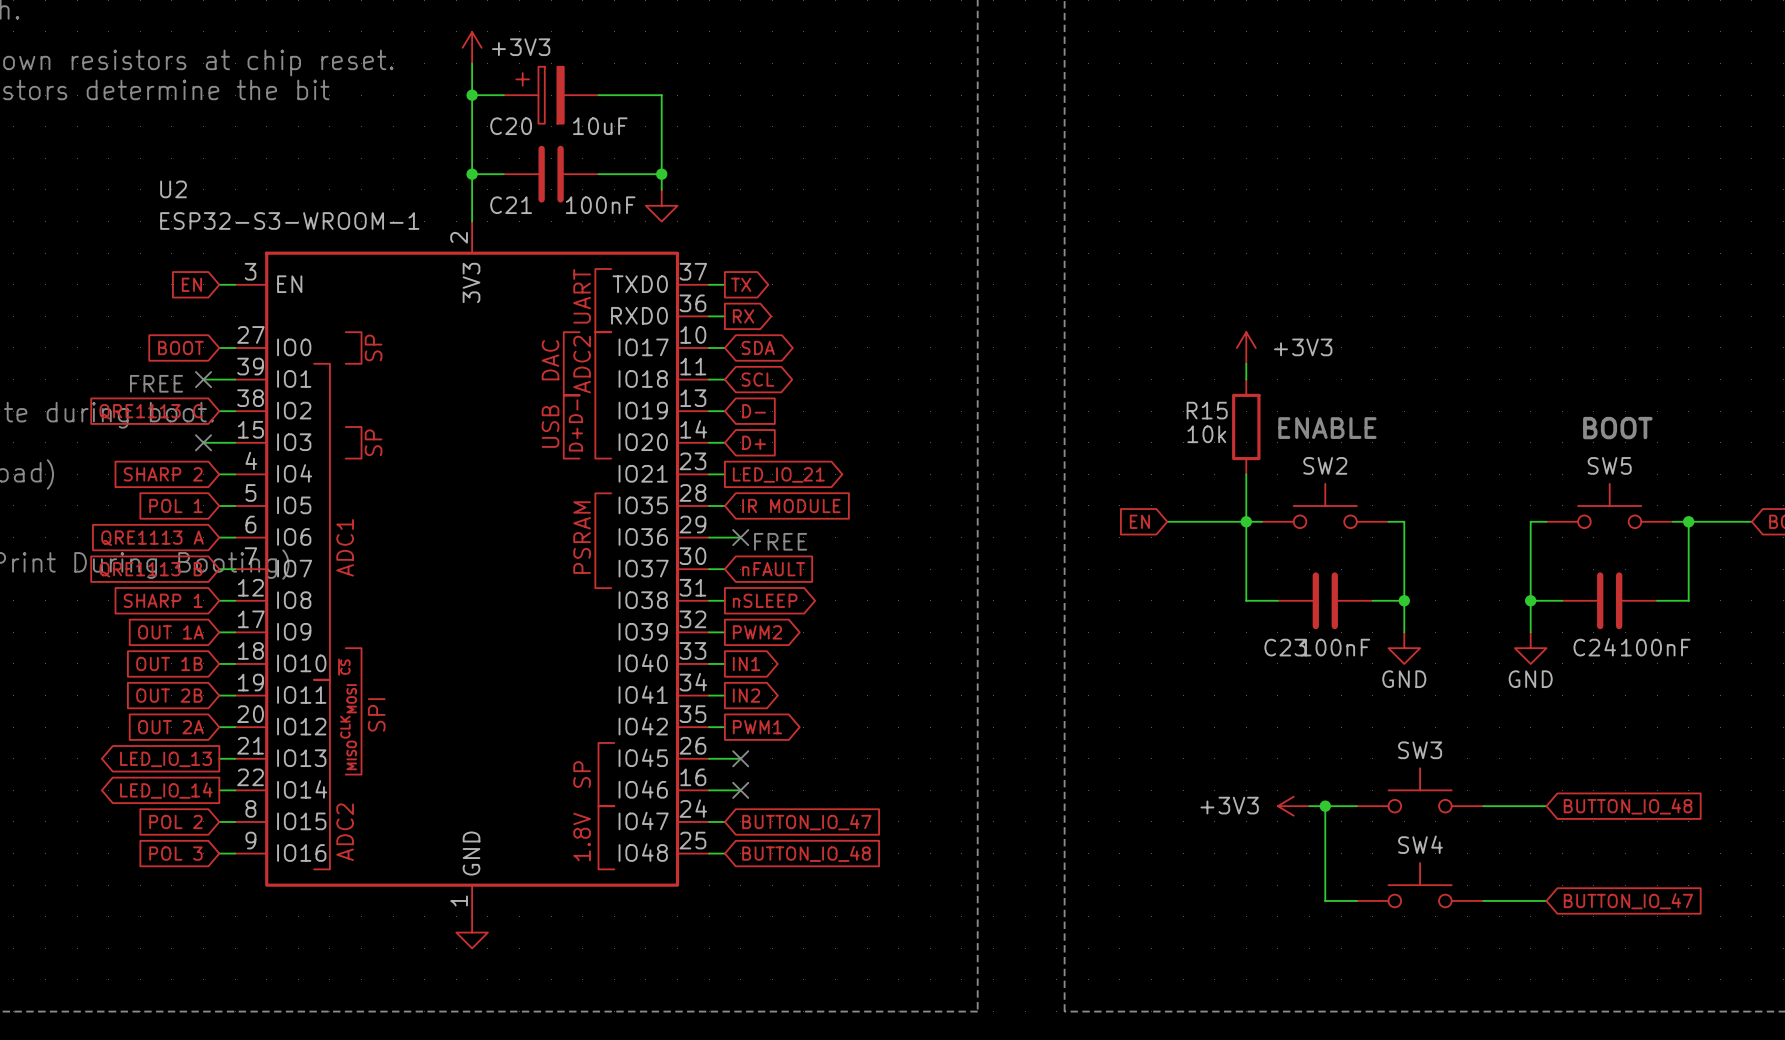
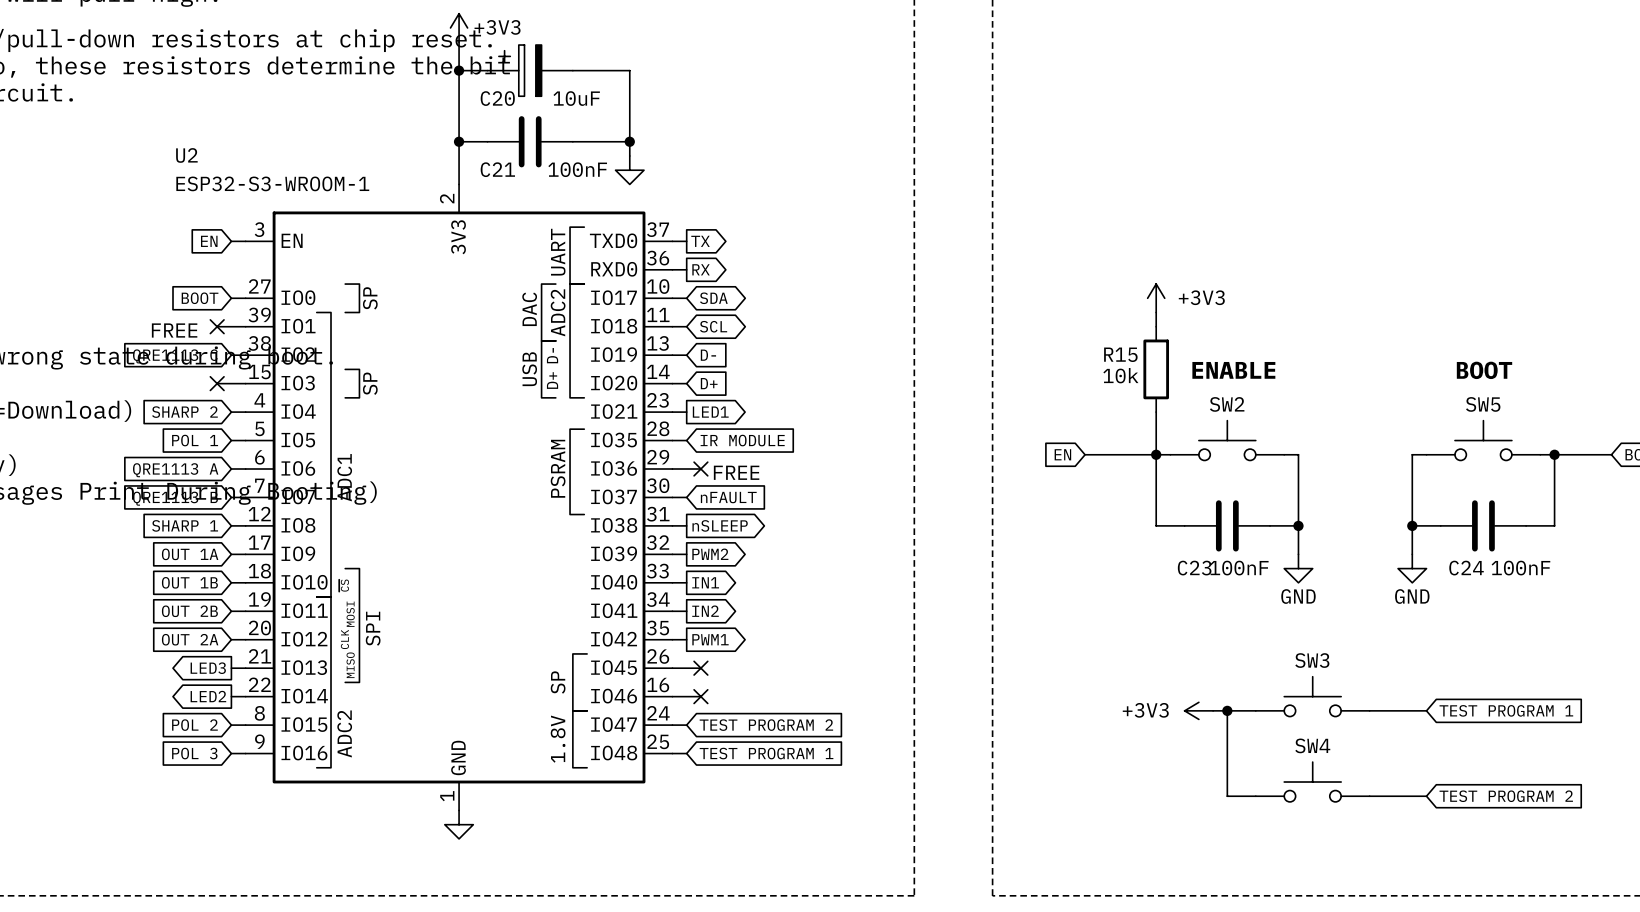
global label: LED_IO_21 (778, 474) -> LED1 (710, 412)
global label: LED_IO_13 (166, 759) -> LED3 (208, 668)
global label: LED_IO_14 (166, 790) -> LED2 (208, 696)
global label: BUTTON_IO_48 (1628, 806) -> TEST PROGRAM 1 (1506, 710)
global label: BUTTON_IO_47 (806, 822) -> TEST PROGRAM 2 (766, 725)
global label: BUTTON_IO_48 (806, 853) -> TEST PROGRAM 1 (766, 753)
global label: BUTTON_IO_47 (1628, 901) -> TEST PROGRAM 2 (1506, 796)

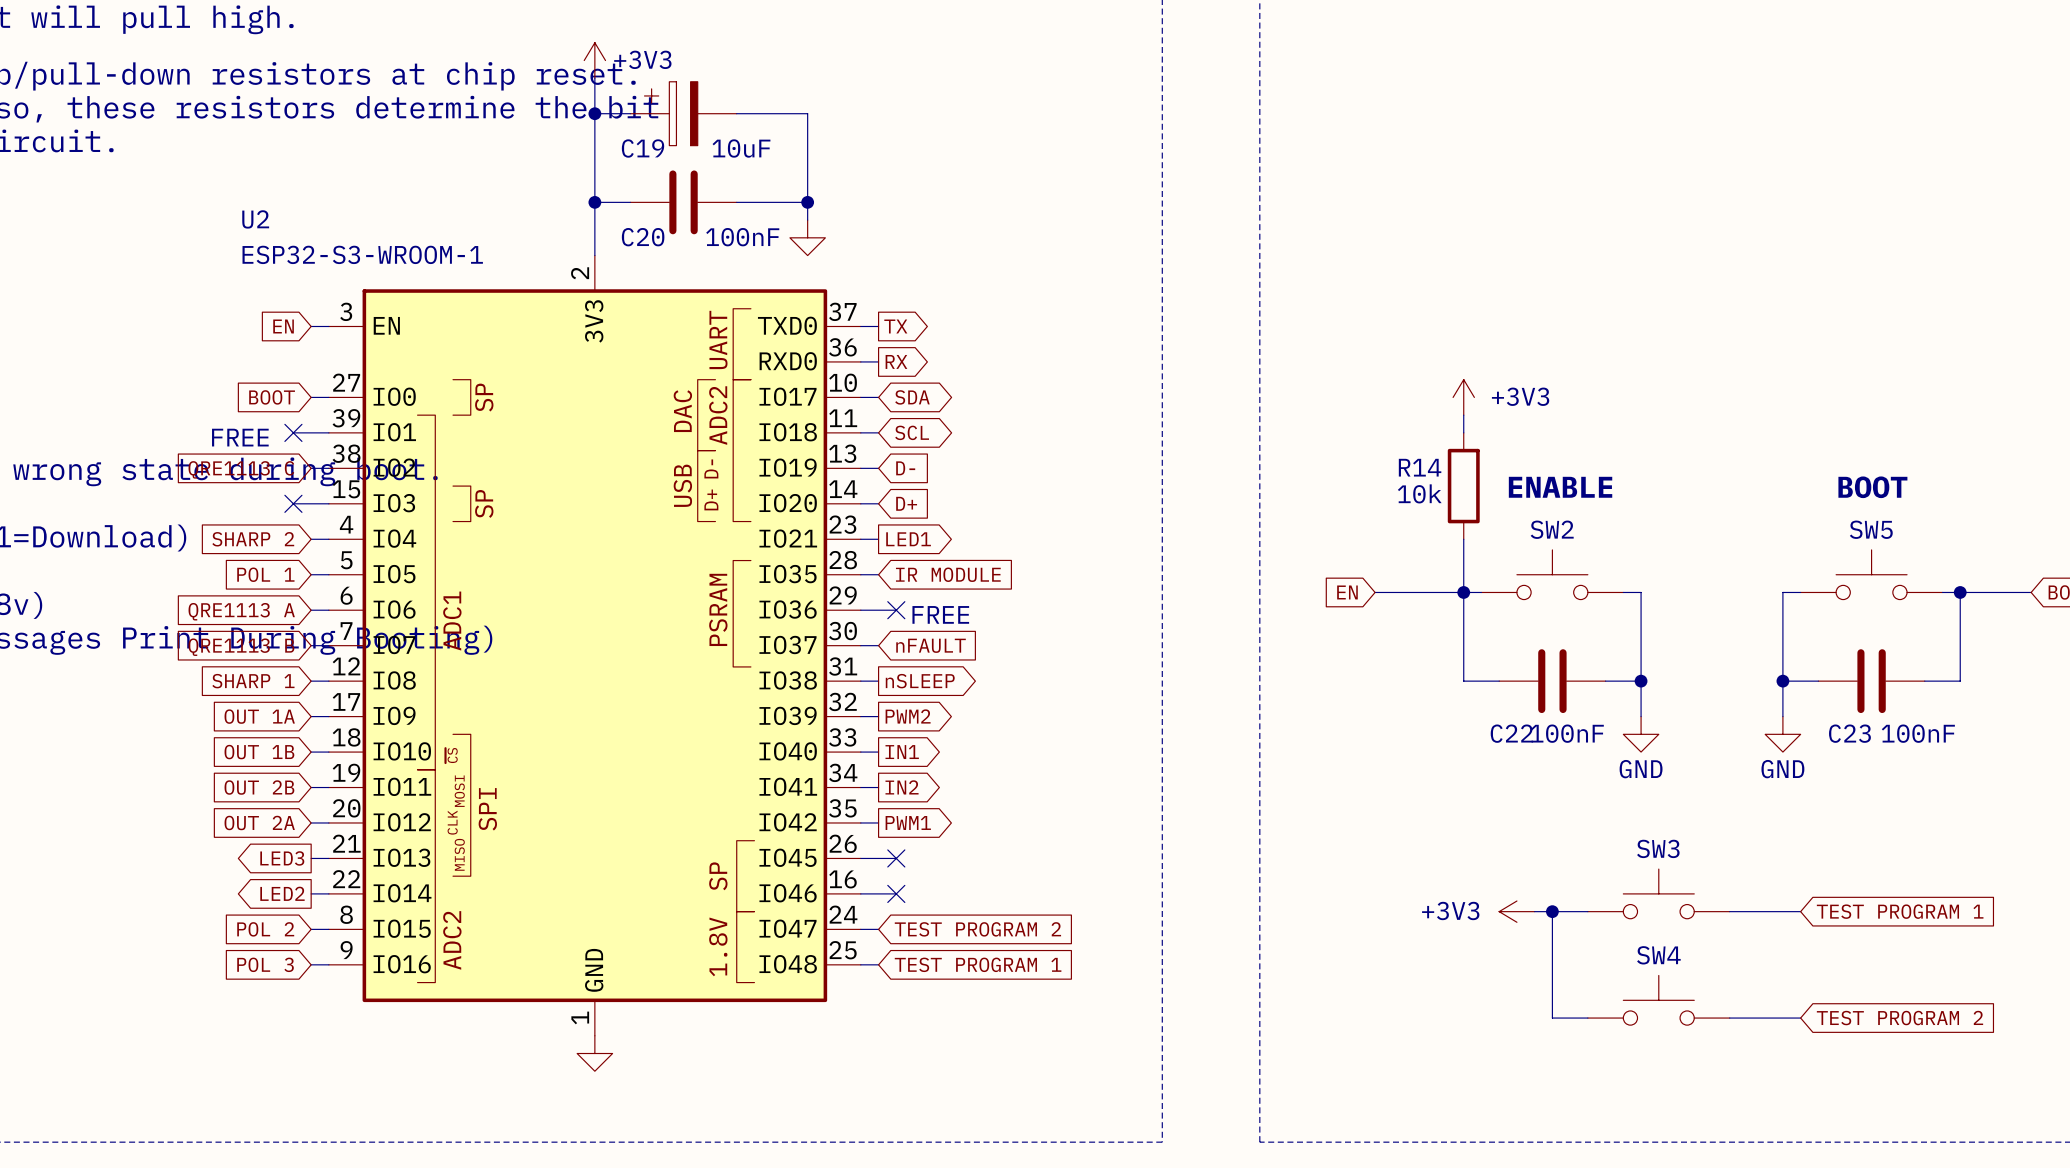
C20 name: C20 (497, 98) -> C19 (643, 148)
C21 name: C21 (497, 169) -> C20 (643, 237)
R15 name: R15 (1120, 354) -> R14 (1420, 467)
C23 name: C23 (1194, 568) -> C22 (1511, 733)
C24 name: C24 (1466, 568) -> C23 (1849, 733)

